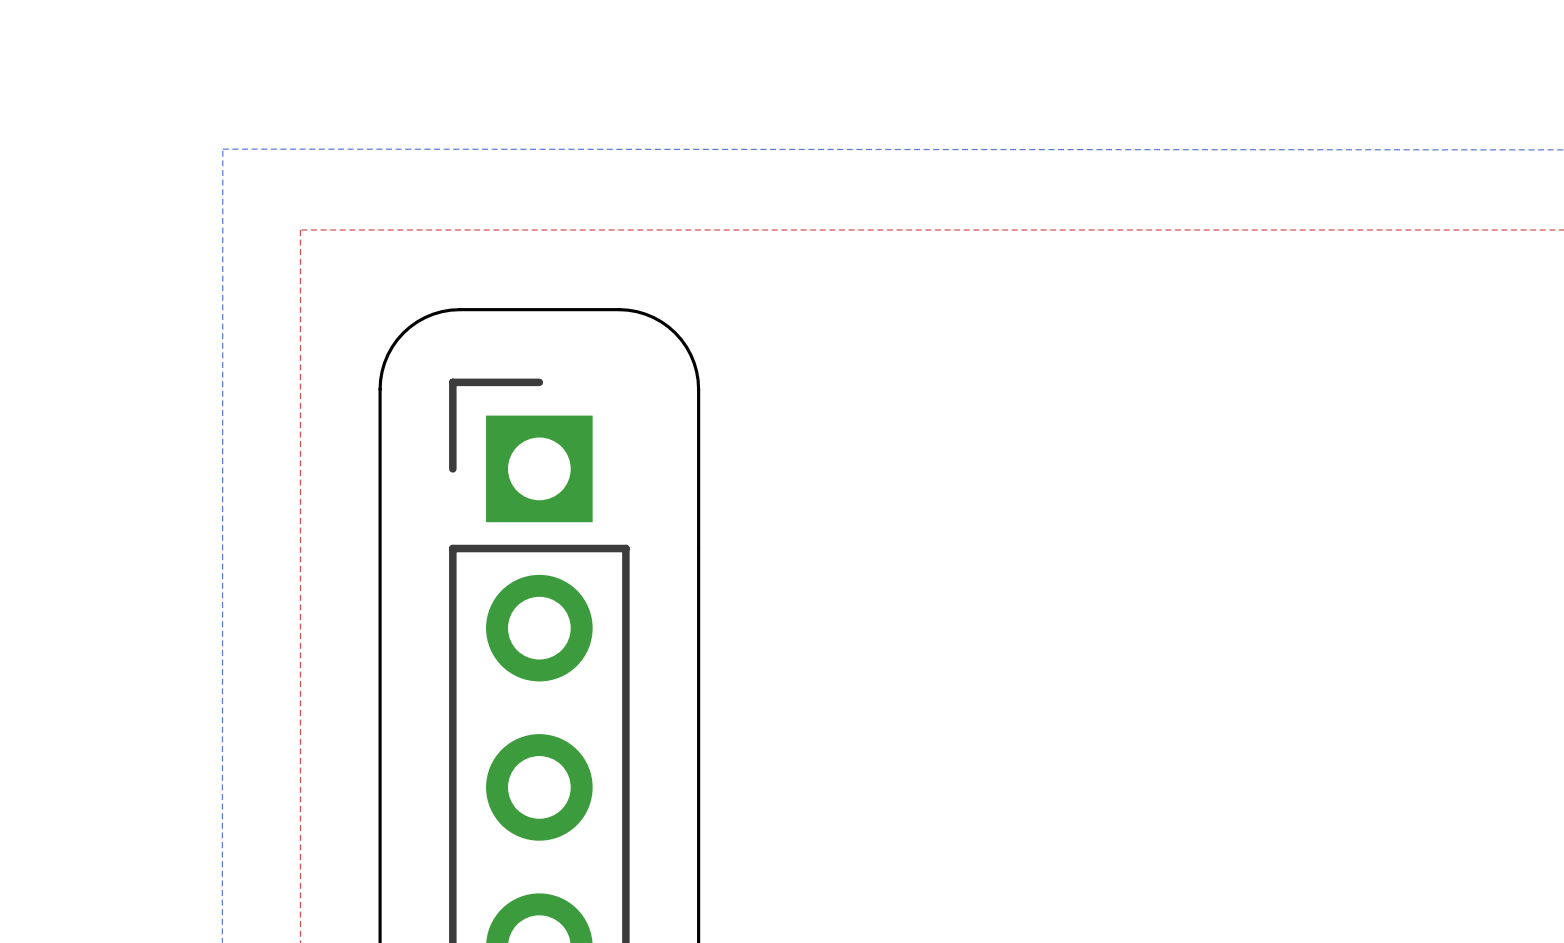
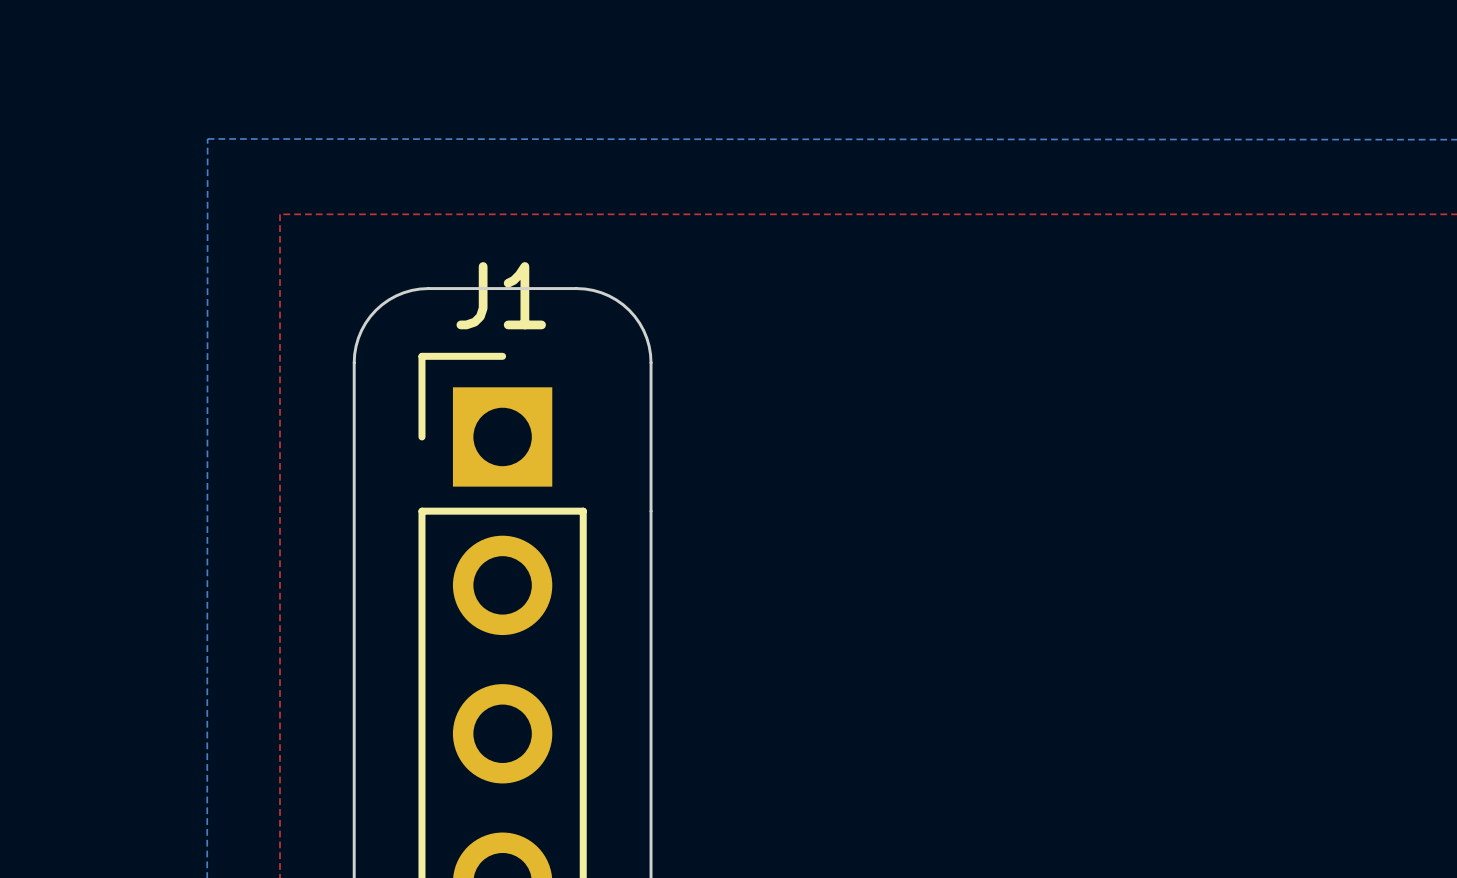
J1 name: none -> J1 (501, 295)

